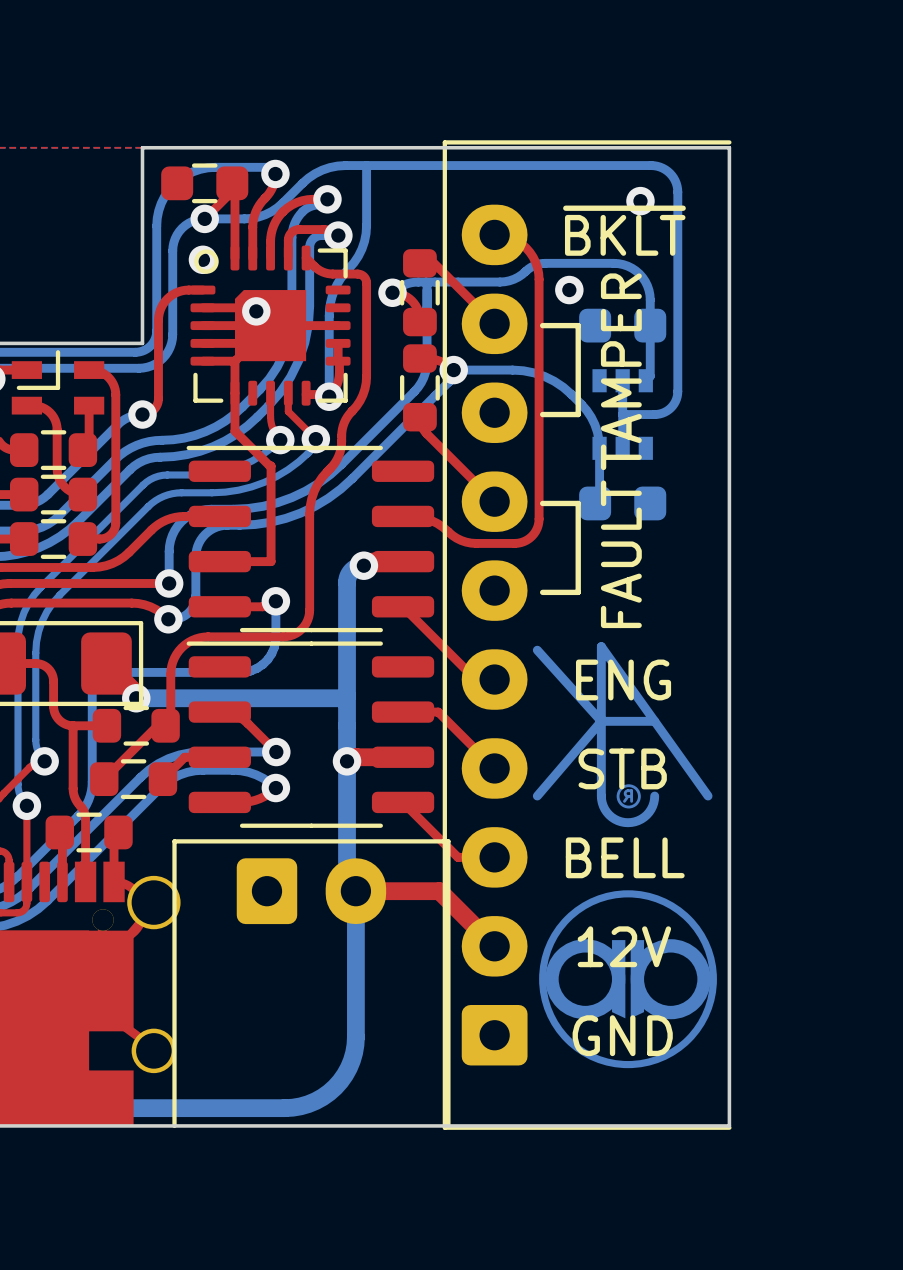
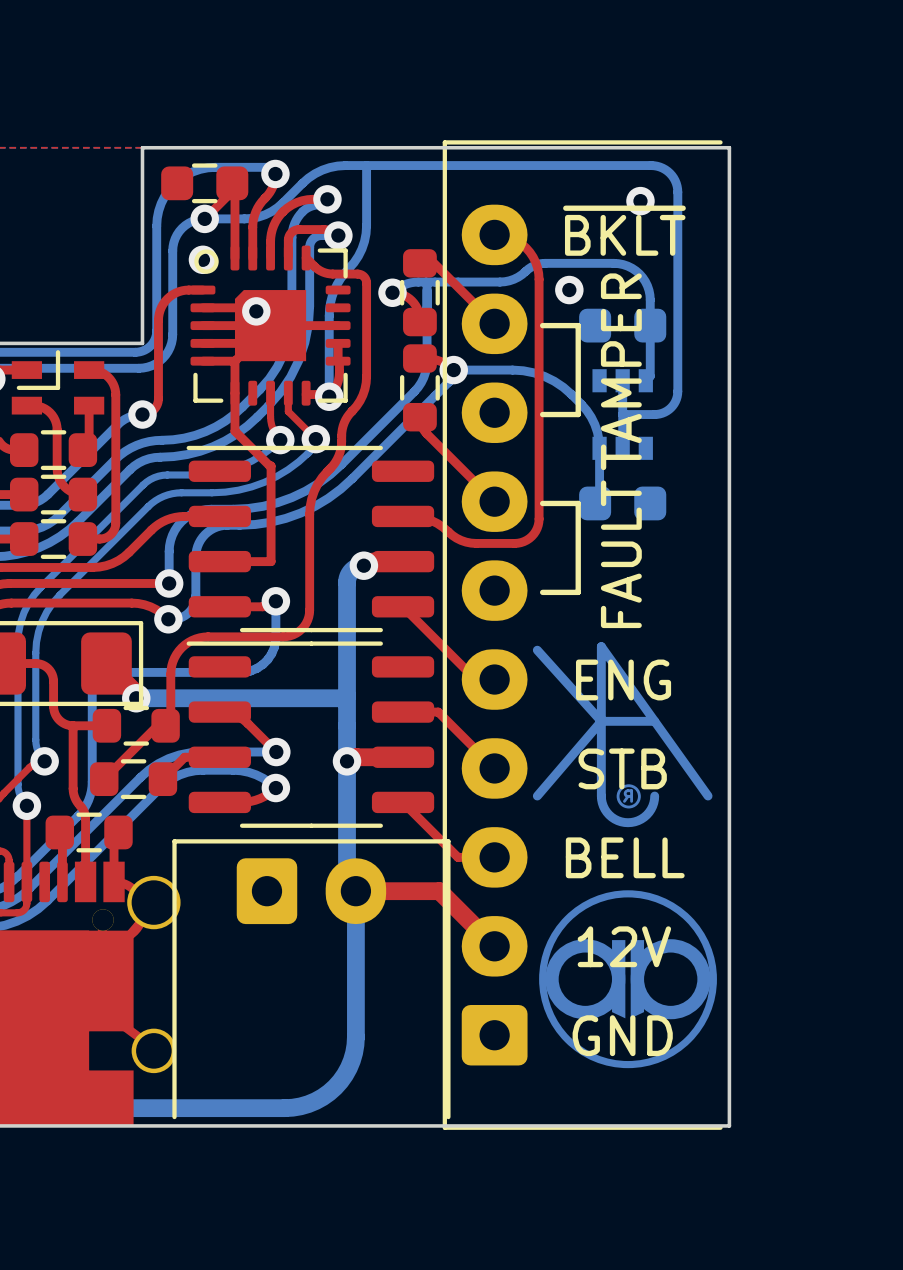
part footprint: [442, 140, 732, 1130] -> [442, 140, 723, 1130]
part footprint: [172, 839, 451, 1129] -> [172, 839, 451, 1120]

